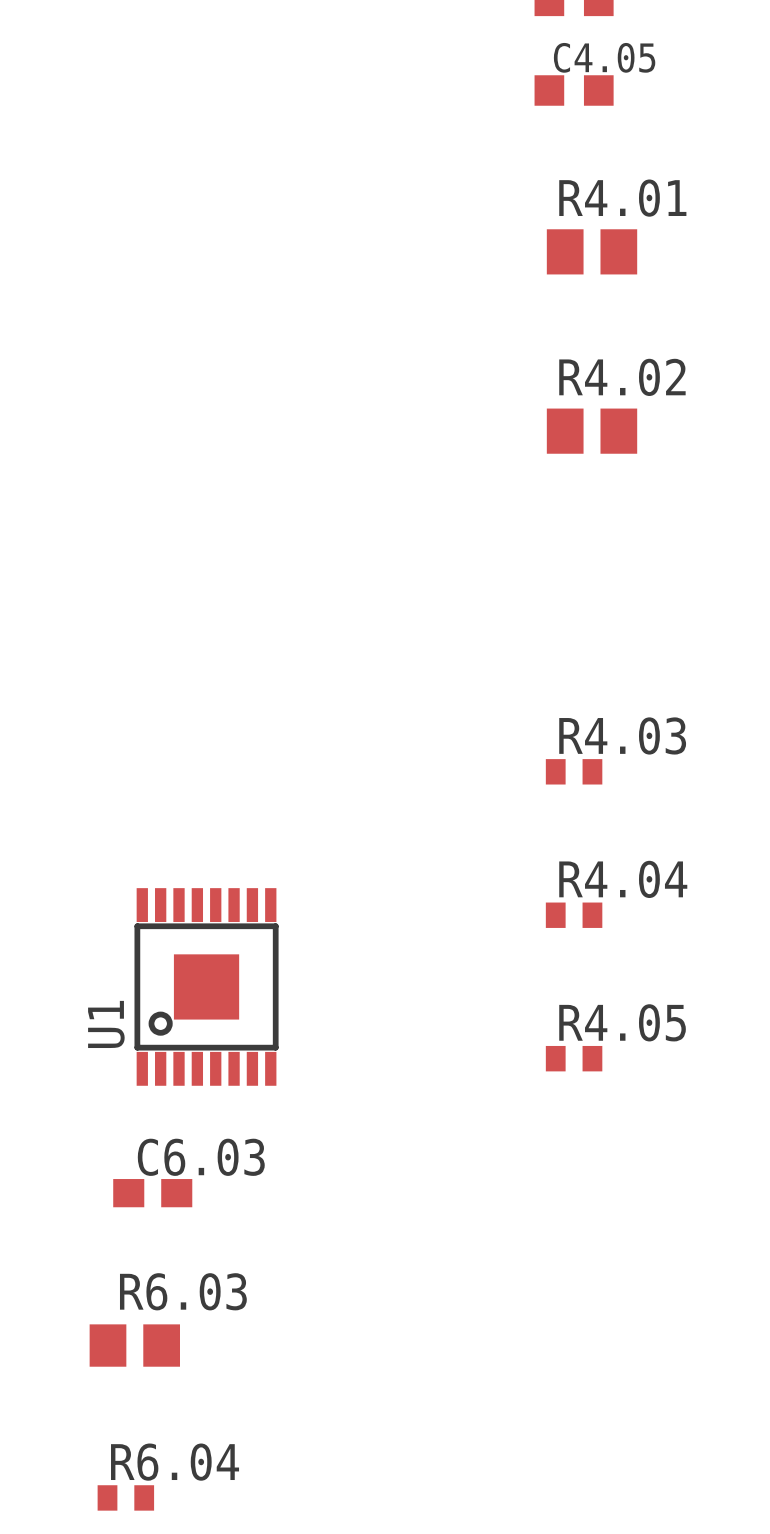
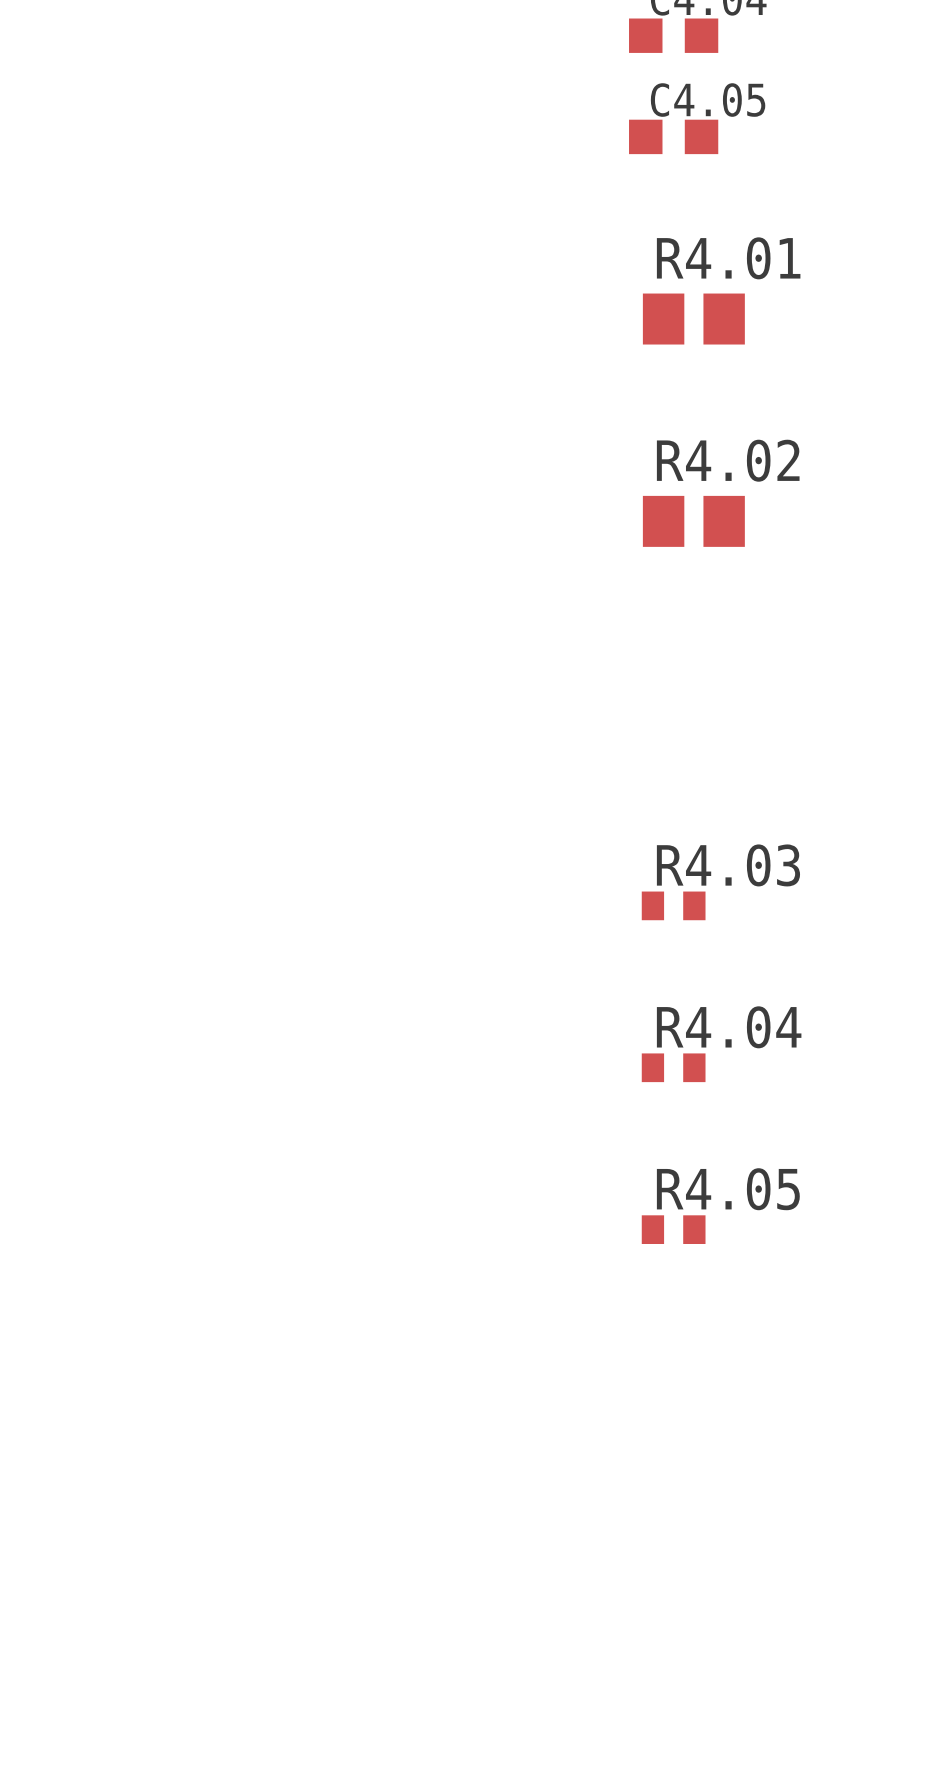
U1: (206, 986) -> none
C6.03: (152, 1193) -> none
R6.03: (134, 1345) -> none
R6.04: (125, 1497) -> none

